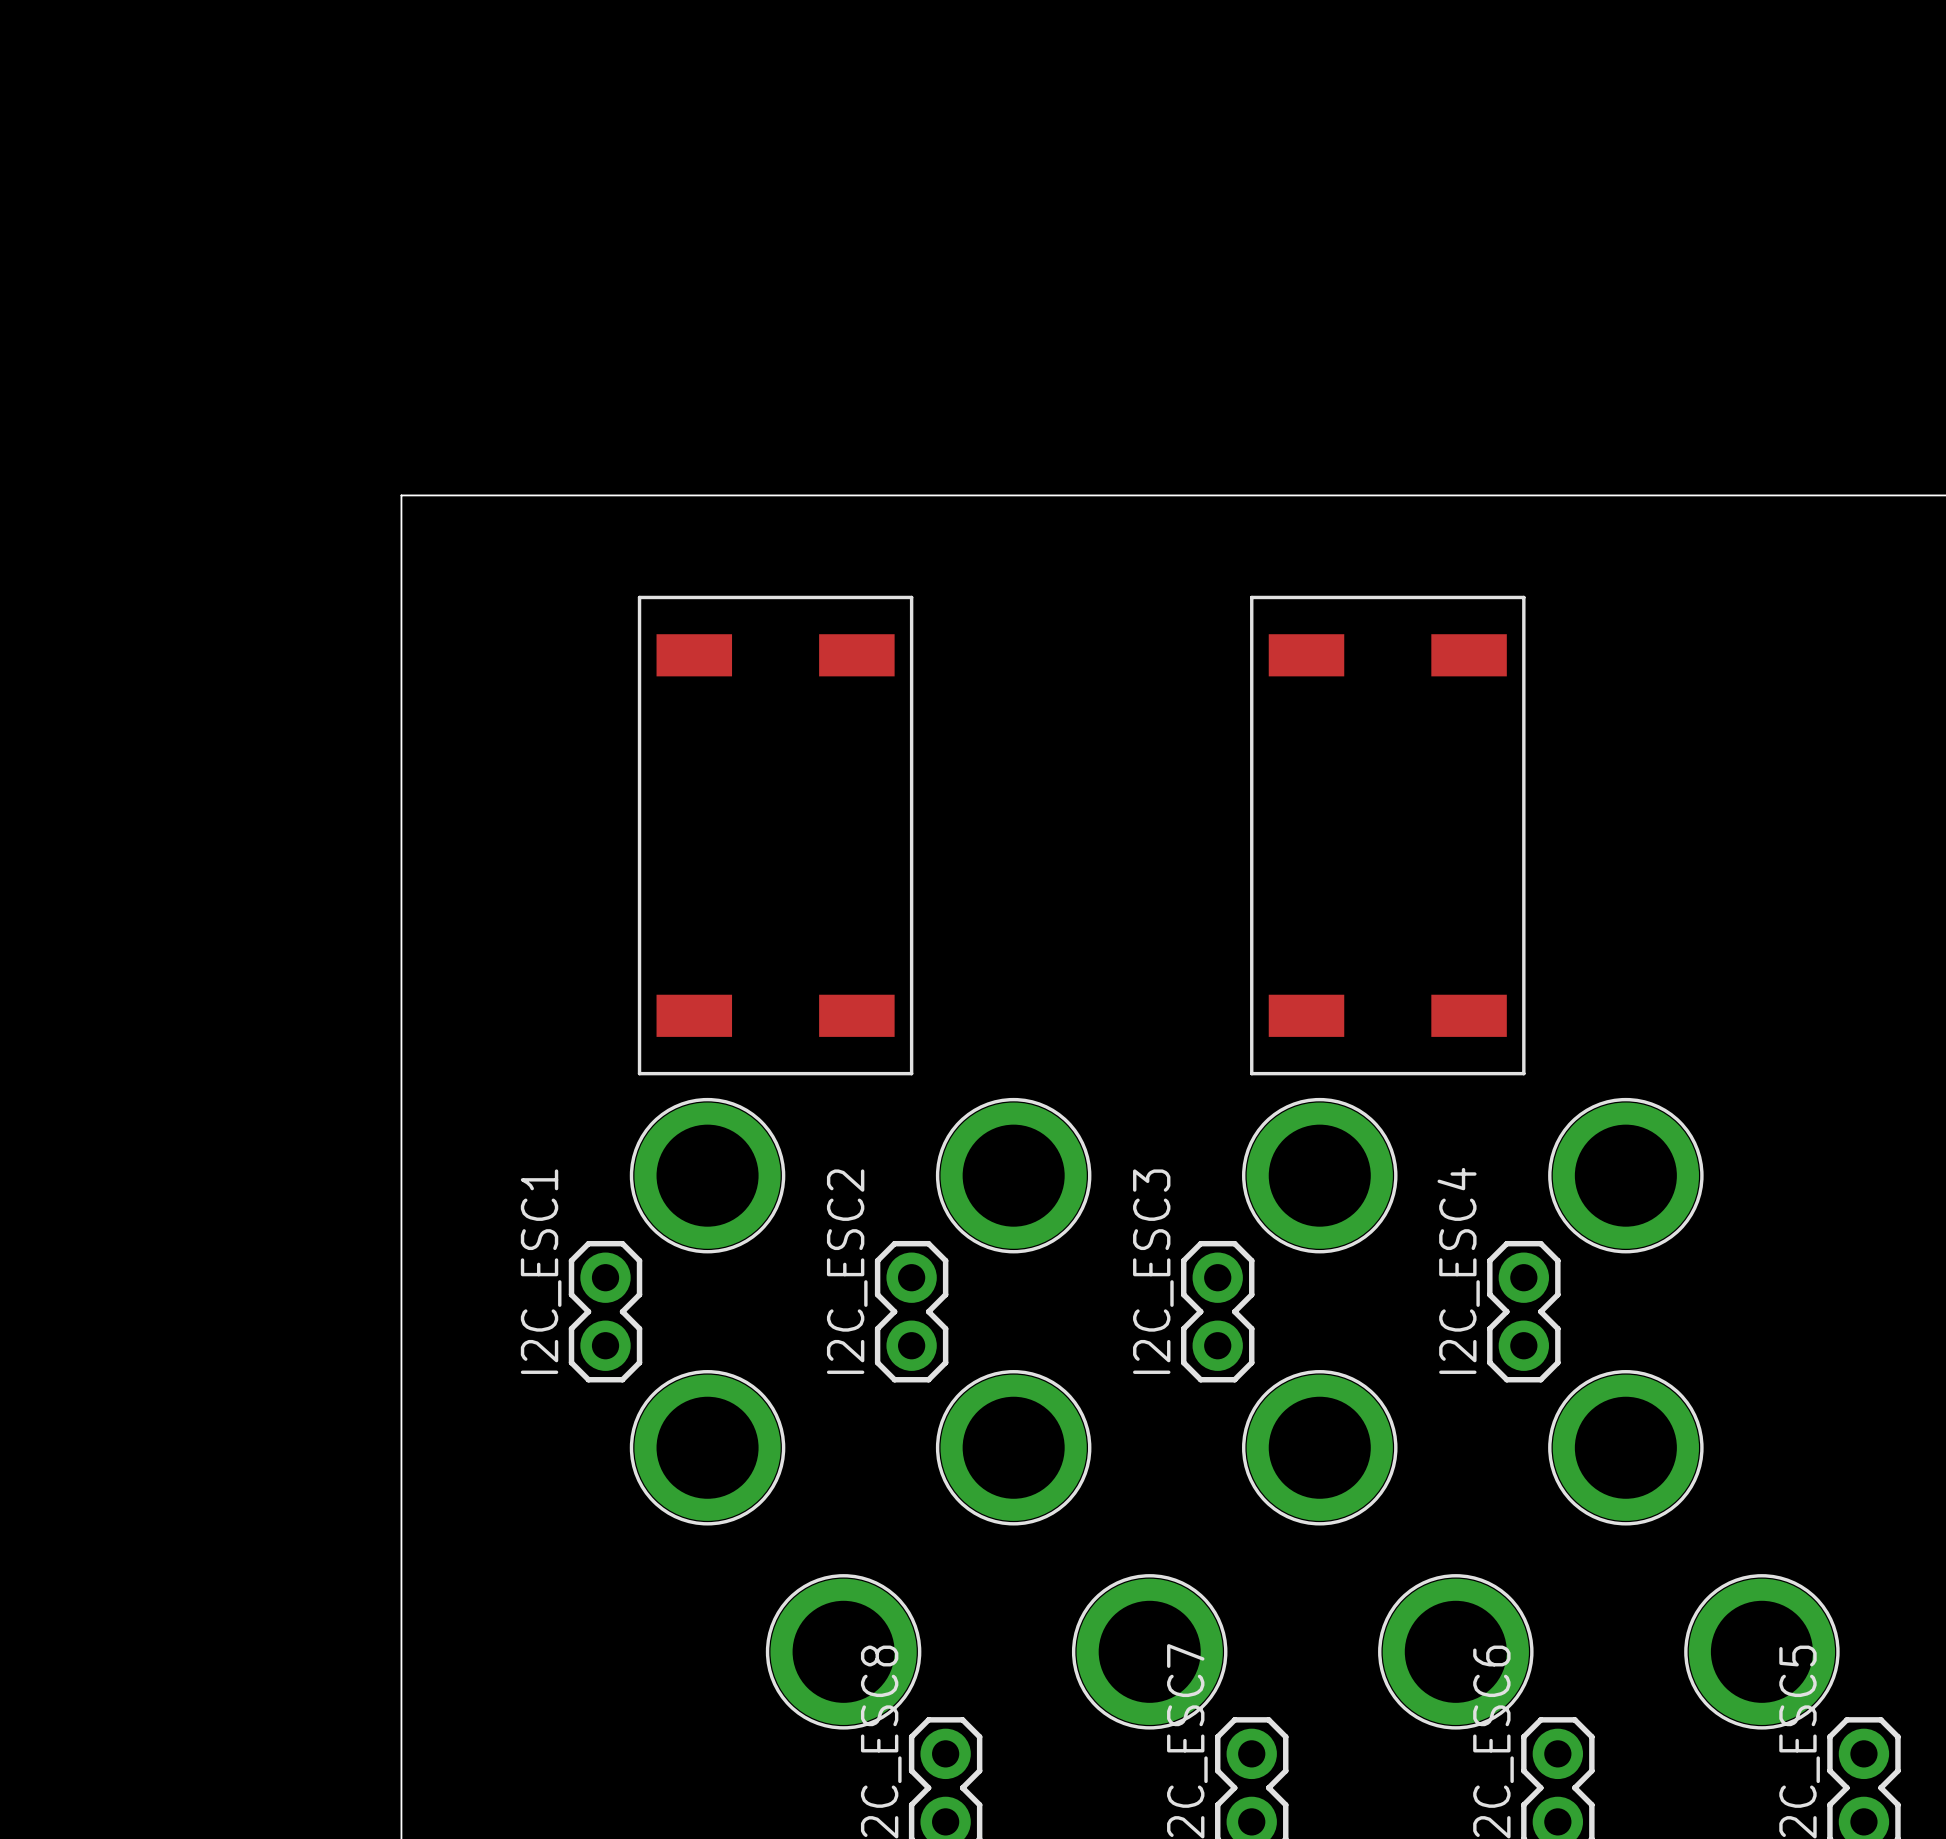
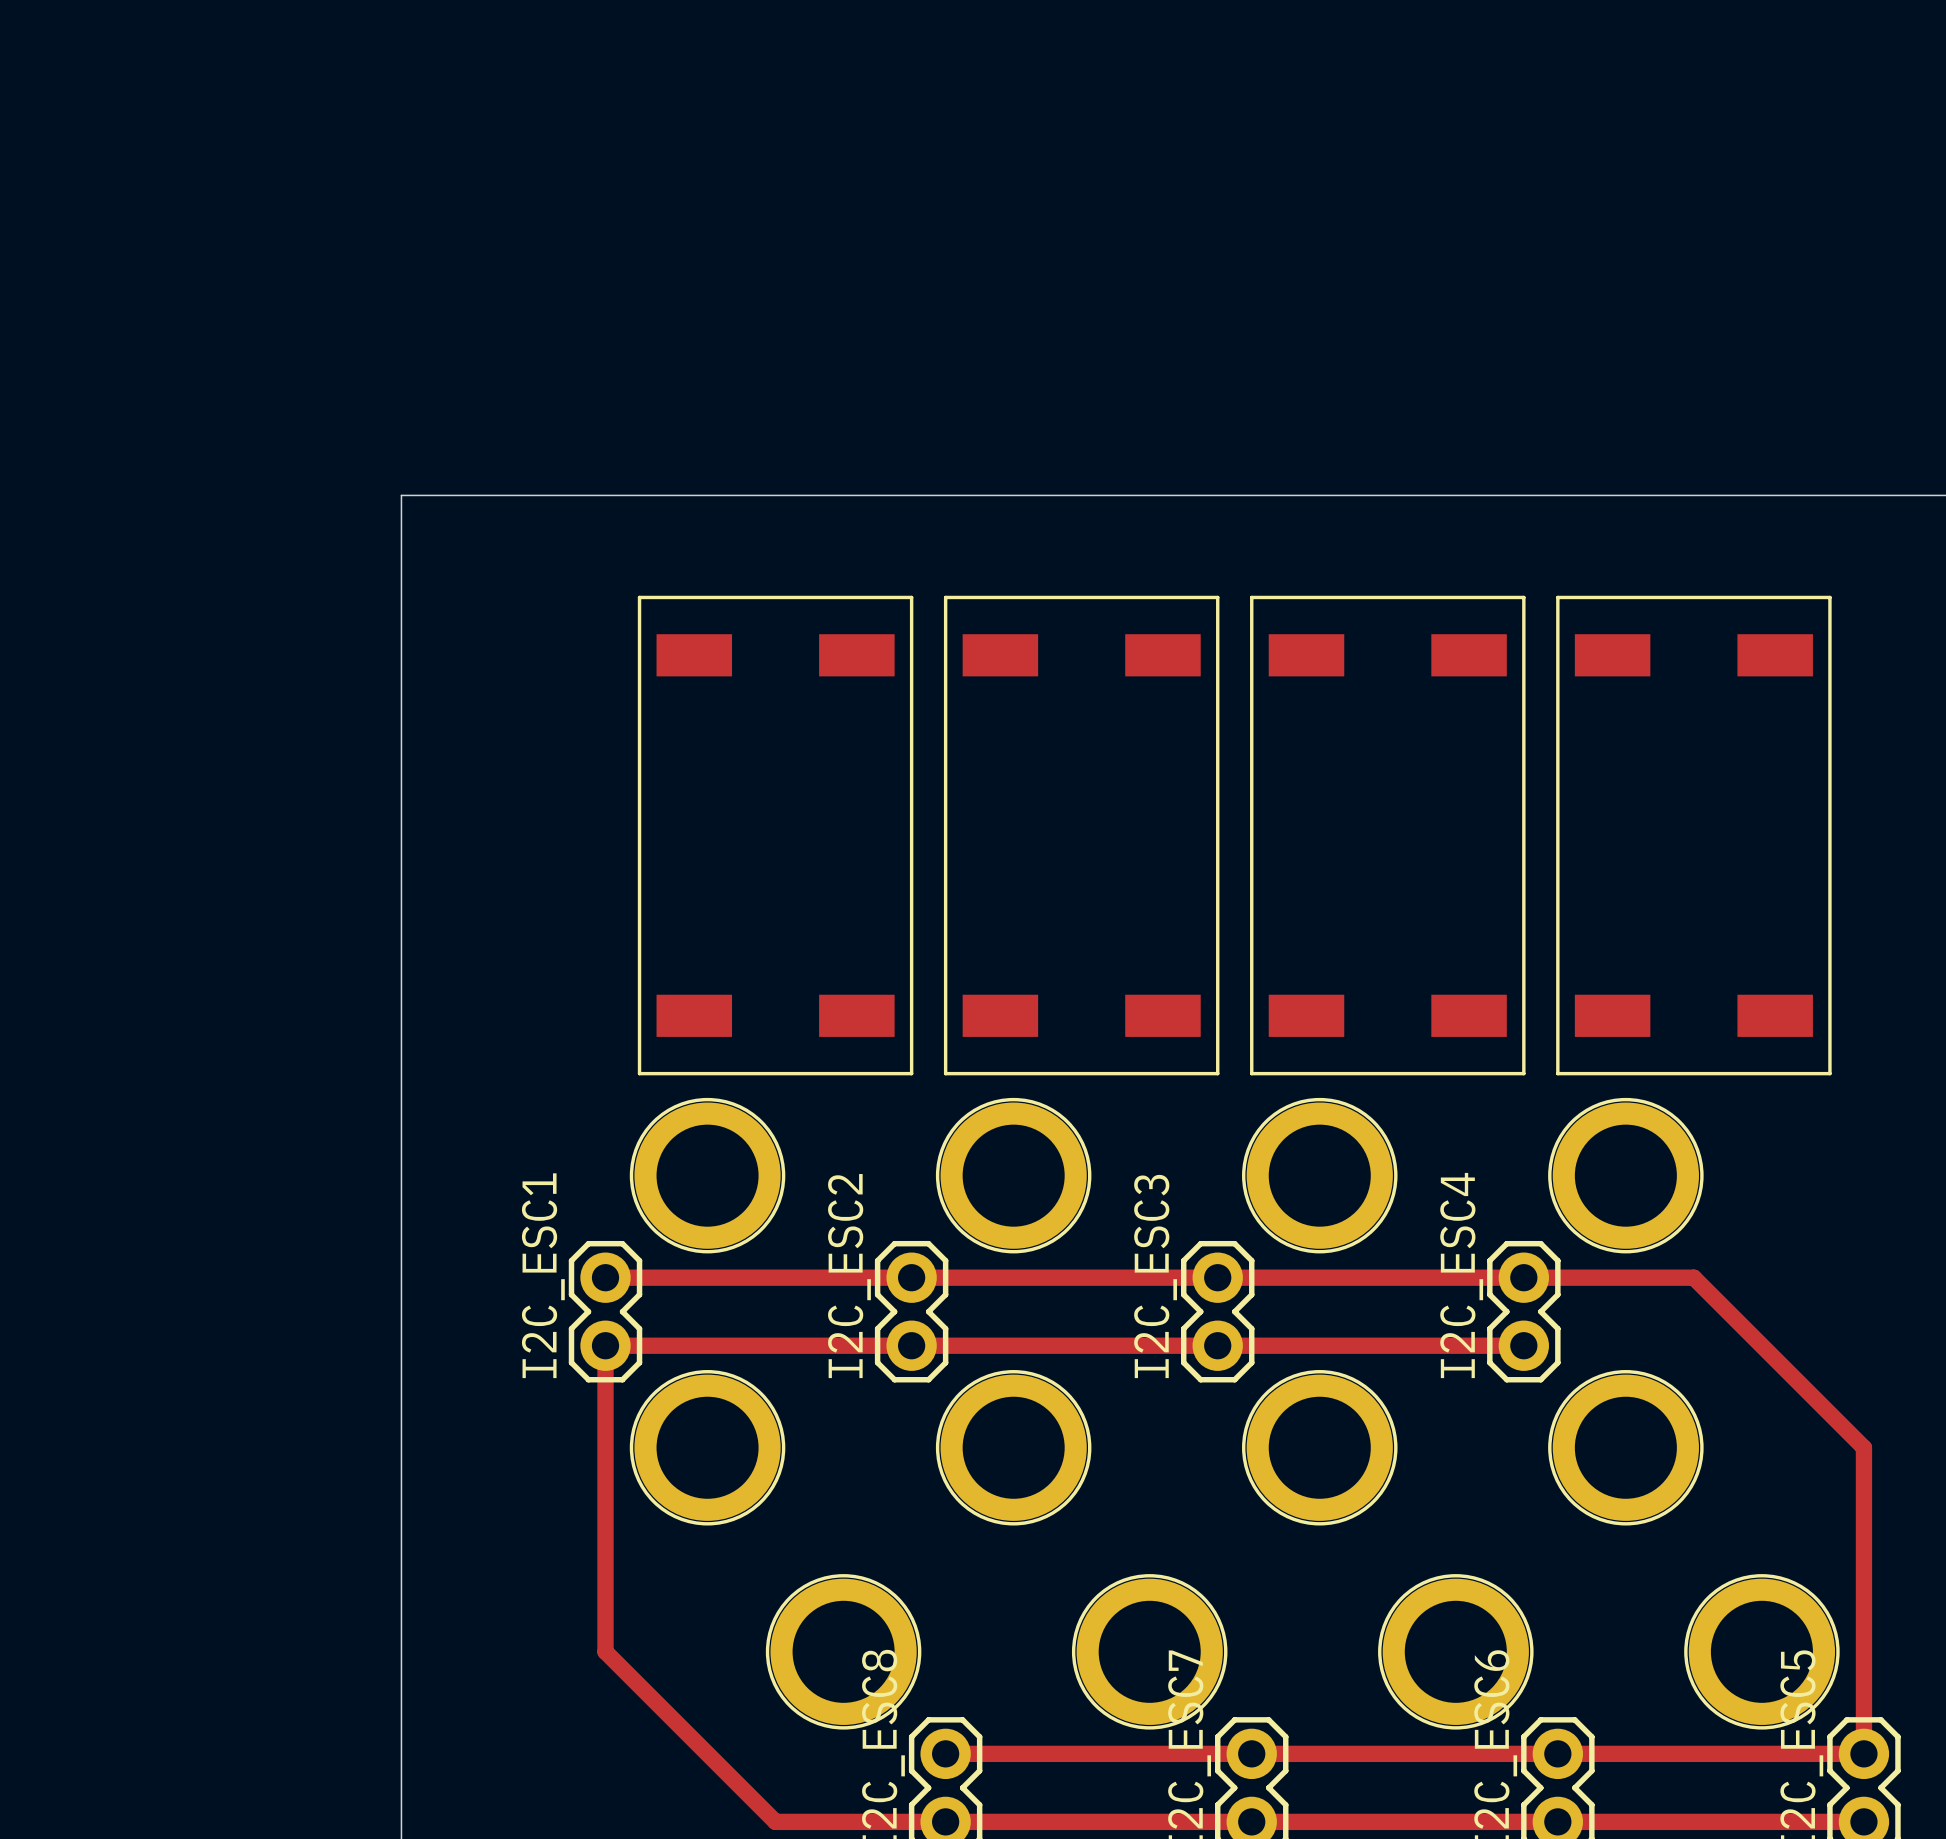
part: none -> (1081, 835)
part: none -> (1693, 835)
track: none -> (605, 1277) (1693, 1277) (1863, 1447) (1863, 1753) (945, 1753)
track: none -> (1523, 1345) (605, 1345) (605, 1651) (775, 1821) (1863, 1821)

